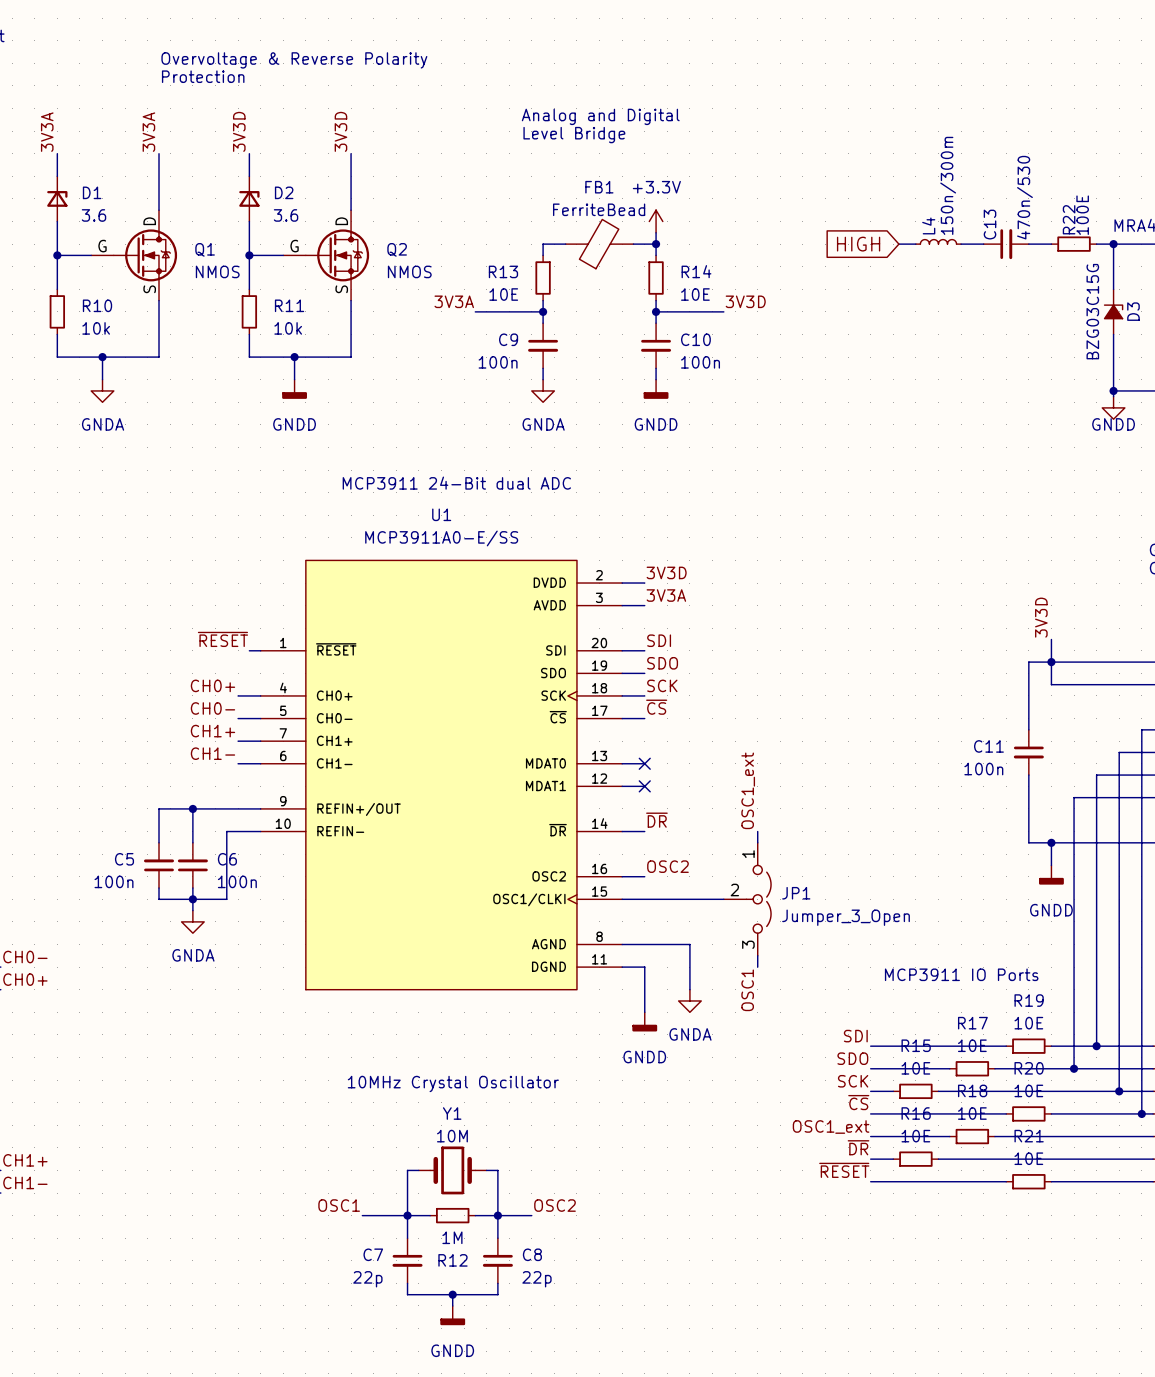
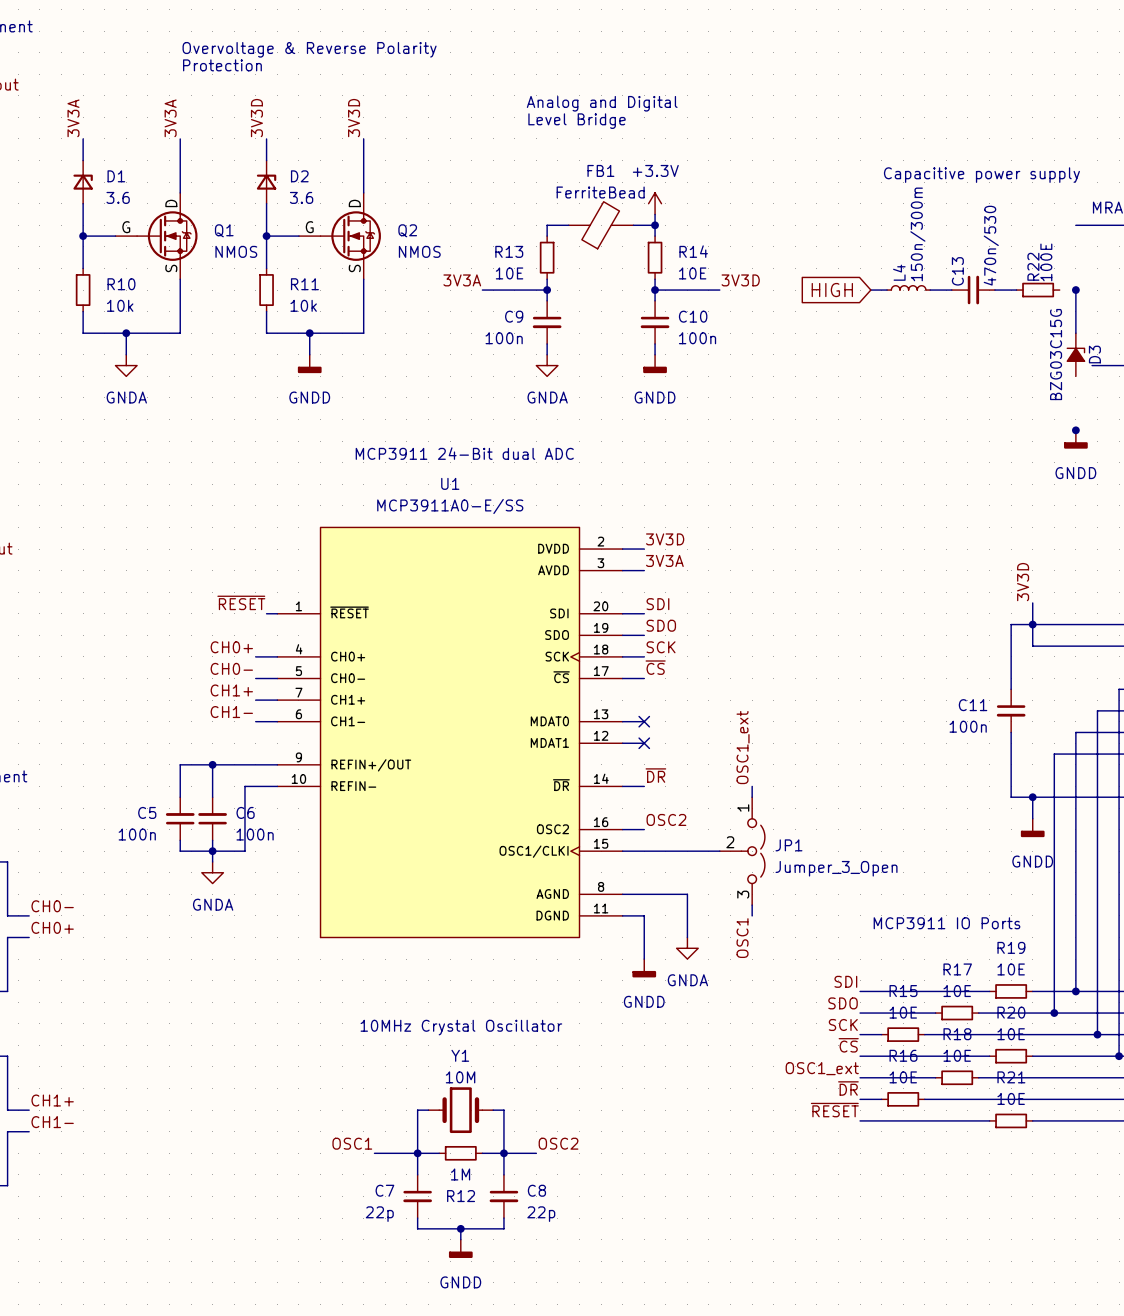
text: none -> Capacitive power supply (981, 175)
L4 position: (938, 241) -> (908, 287)
global label position: HIGH (858, 244) -> HIGH (832, 290)
wire: (898, 244) (915, 244) -> (870, 290) (887, 290)
wire: (961, 244) (983, 244) -> (930, 290) (951, 290)
C13 position: (1006, 244) -> (973, 290)
wire: (1028, 244) (1051, 244) -> (994, 290) (1016, 290)
R22 position: (1074, 244) -> (1038, 290)
wire: (1113, 244) (1113, 289) -> (1075, 290) (1075, 333)
junction: (1113, 244) -> none
junction: none -> (1075, 290)
D3 position: (1113, 311) -> (1075, 354)
wire: (1113, 334) (1113, 396) -> none
junction: (1113, 390) -> none
power symbol: GNDD (1113, 407) -> none
junction: none -> (1075, 430)
power symbol: none -> GNDD (1075, 439)

